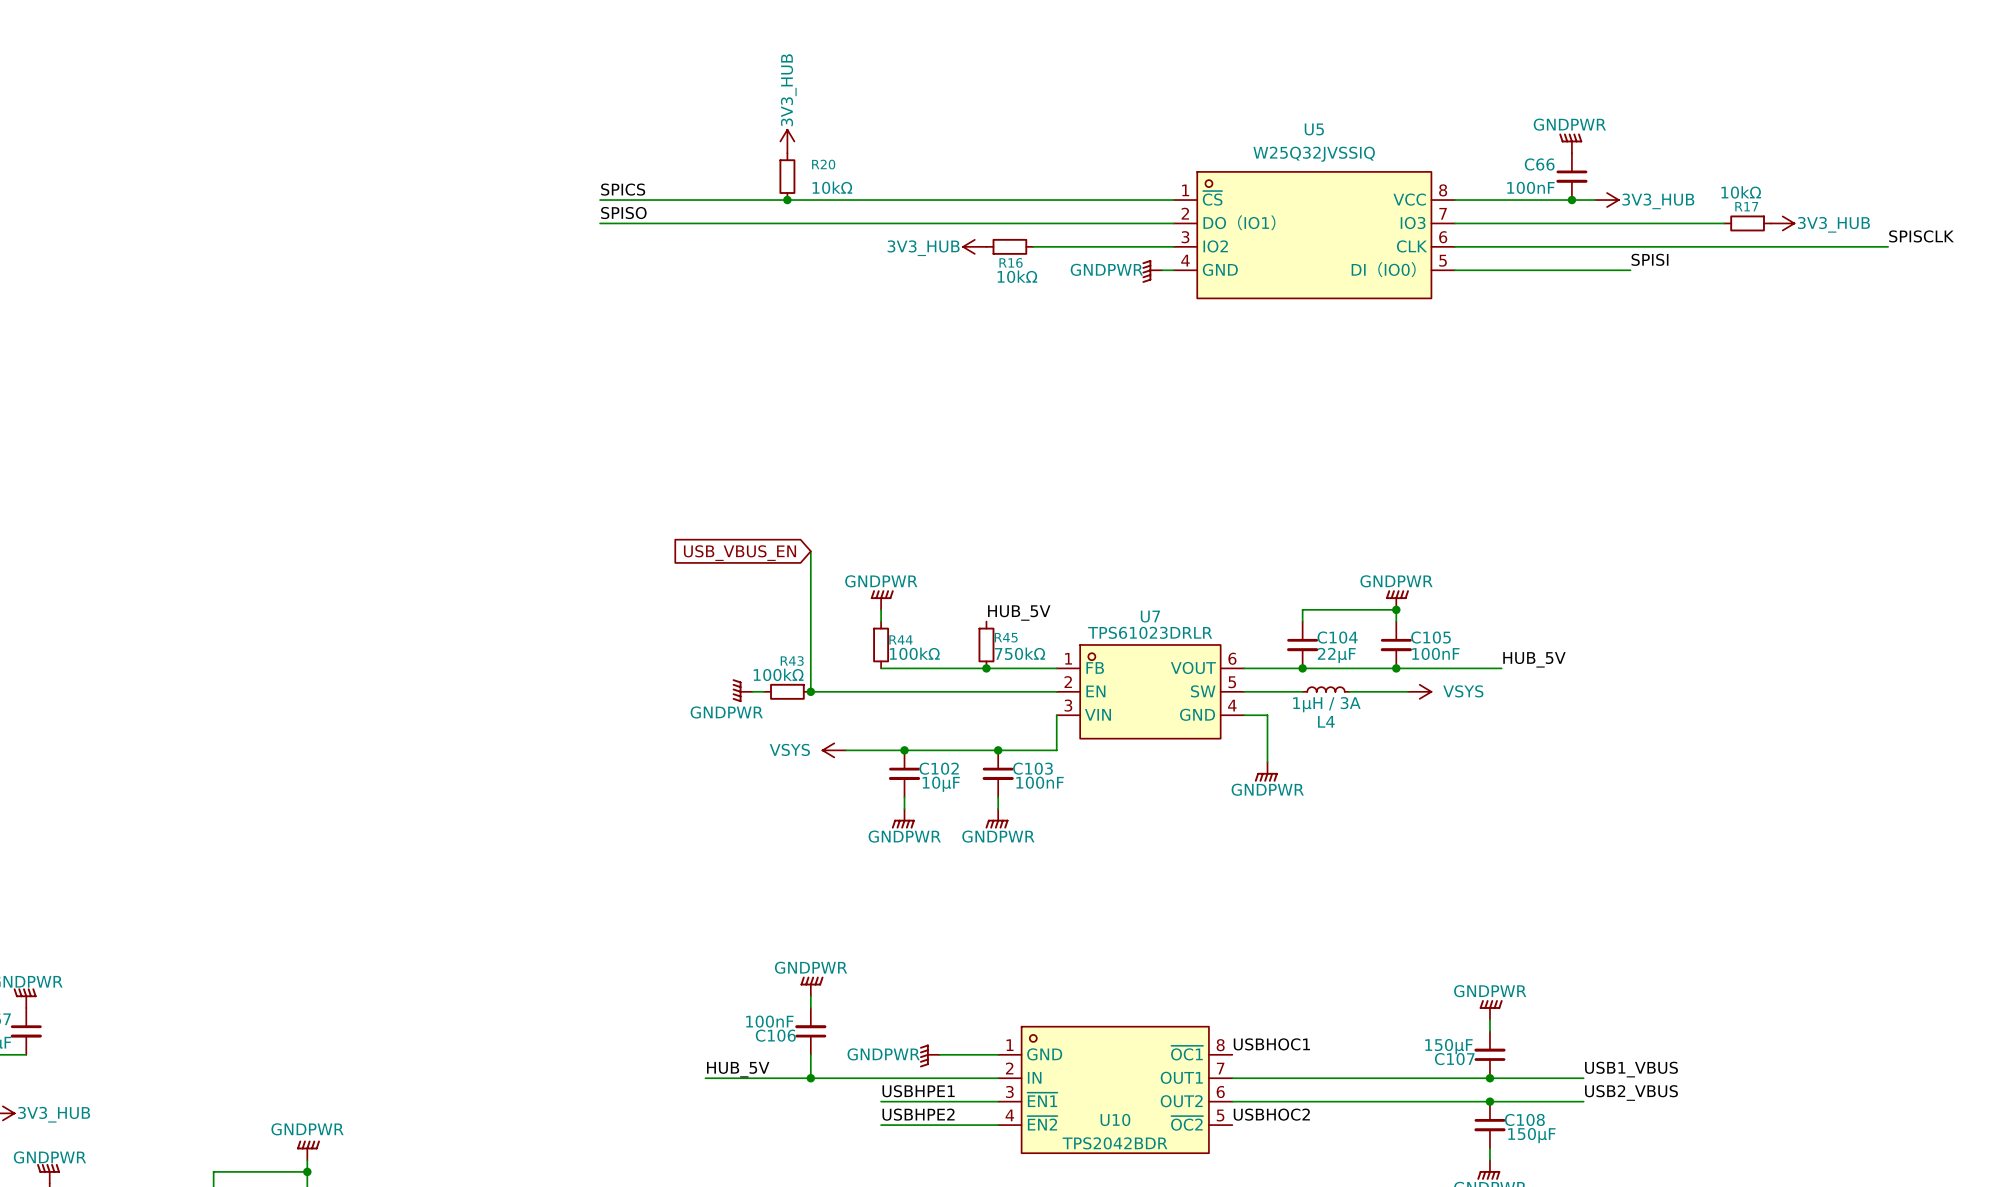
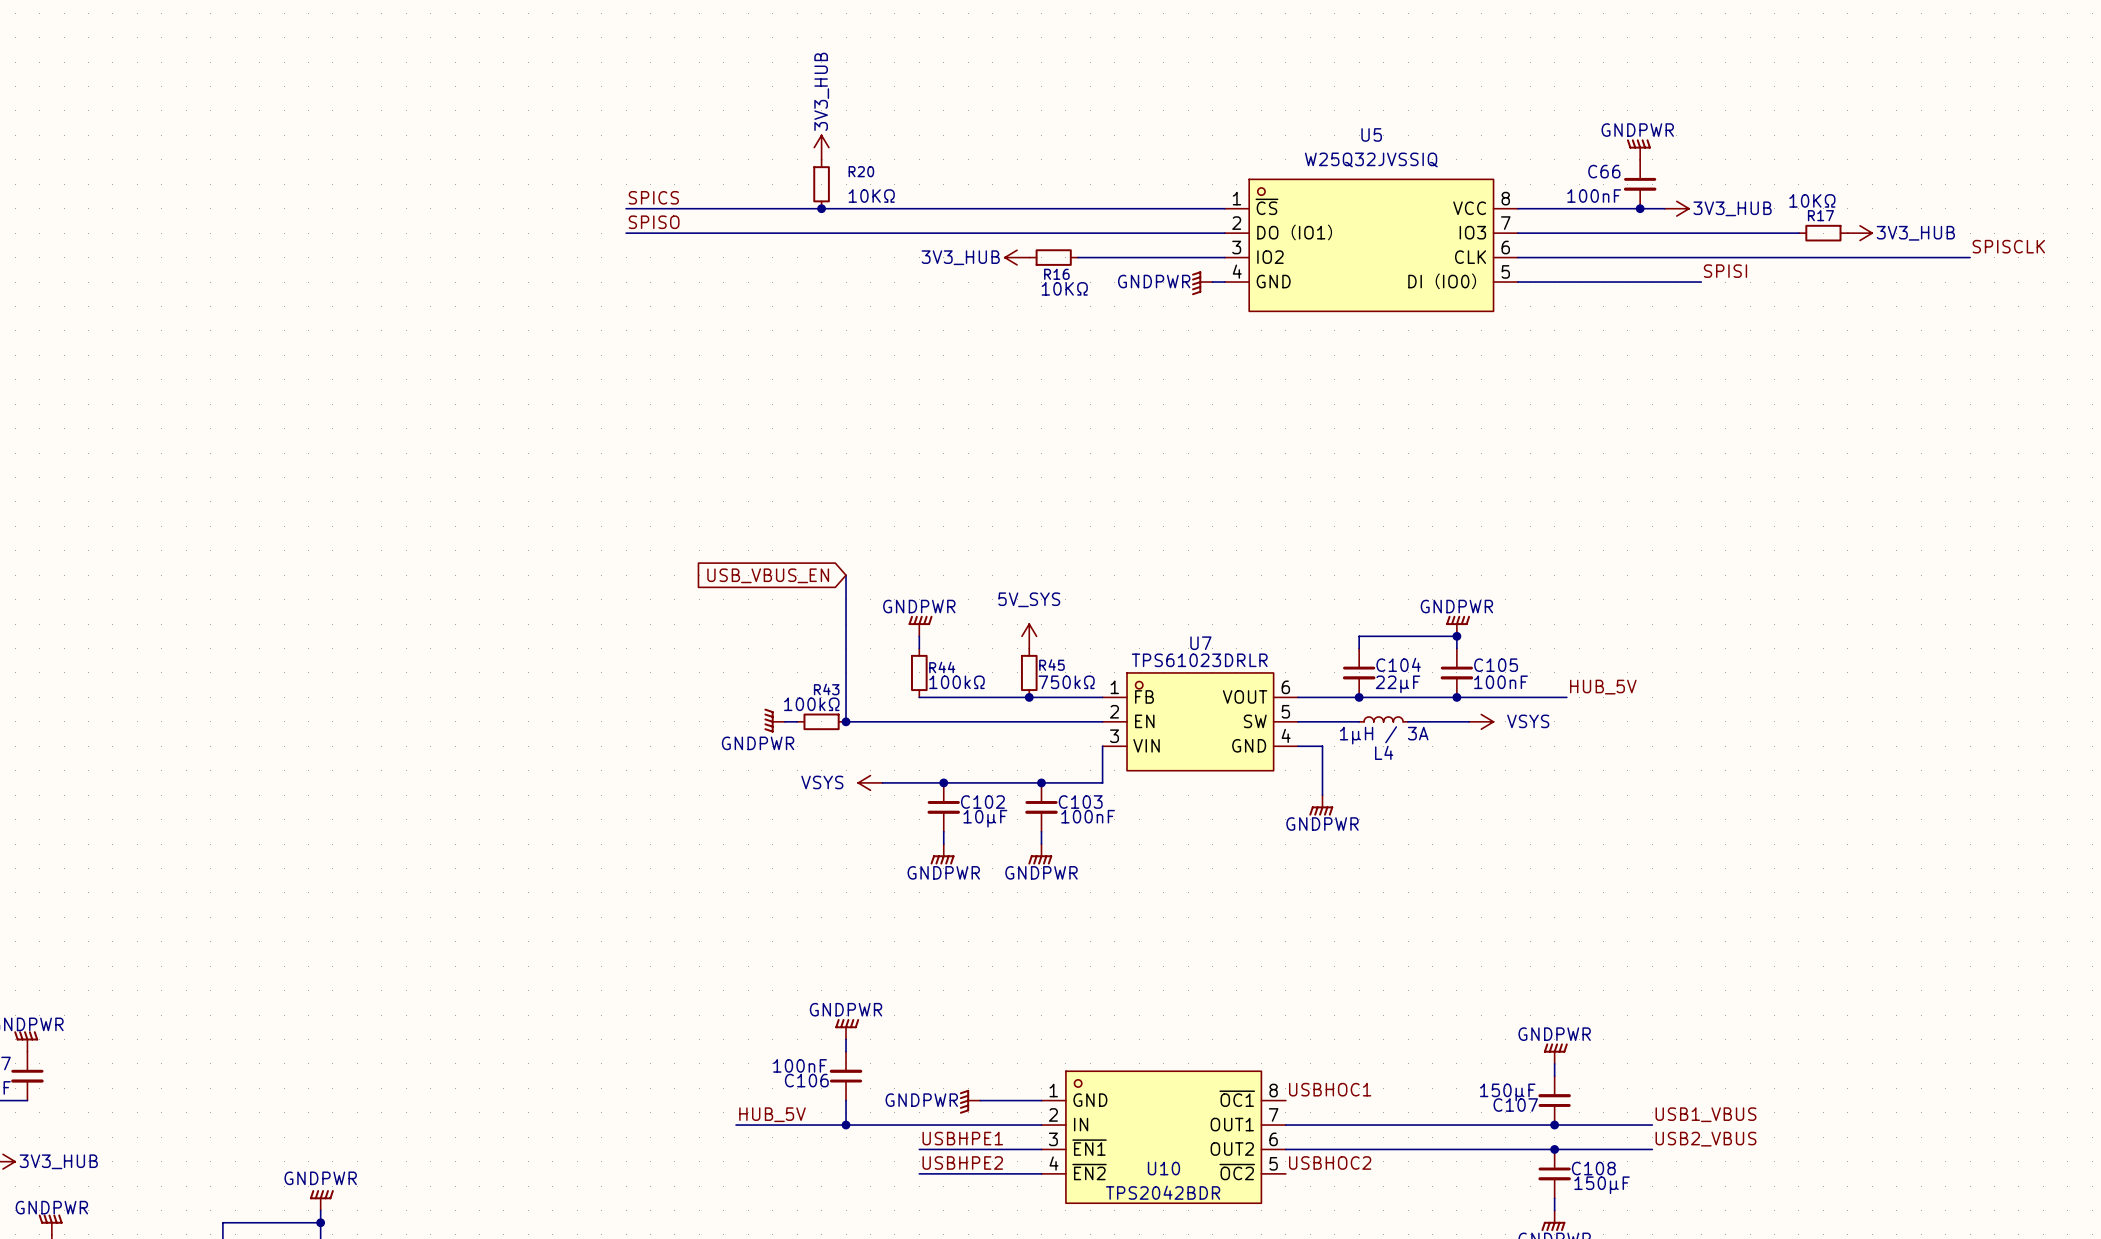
R20 value: 10kΩ (832, 187) -> 10KΩ (871, 196)
R17 value: 10kΩ (1741, 192) -> 10KΩ (1812, 200)
R16 value: 10kΩ (1017, 276) -> 10KΩ (1064, 288)
power symbol: none -> 5V_SYS (1029, 636)
label: HUB_5V (1019, 613) -> none

